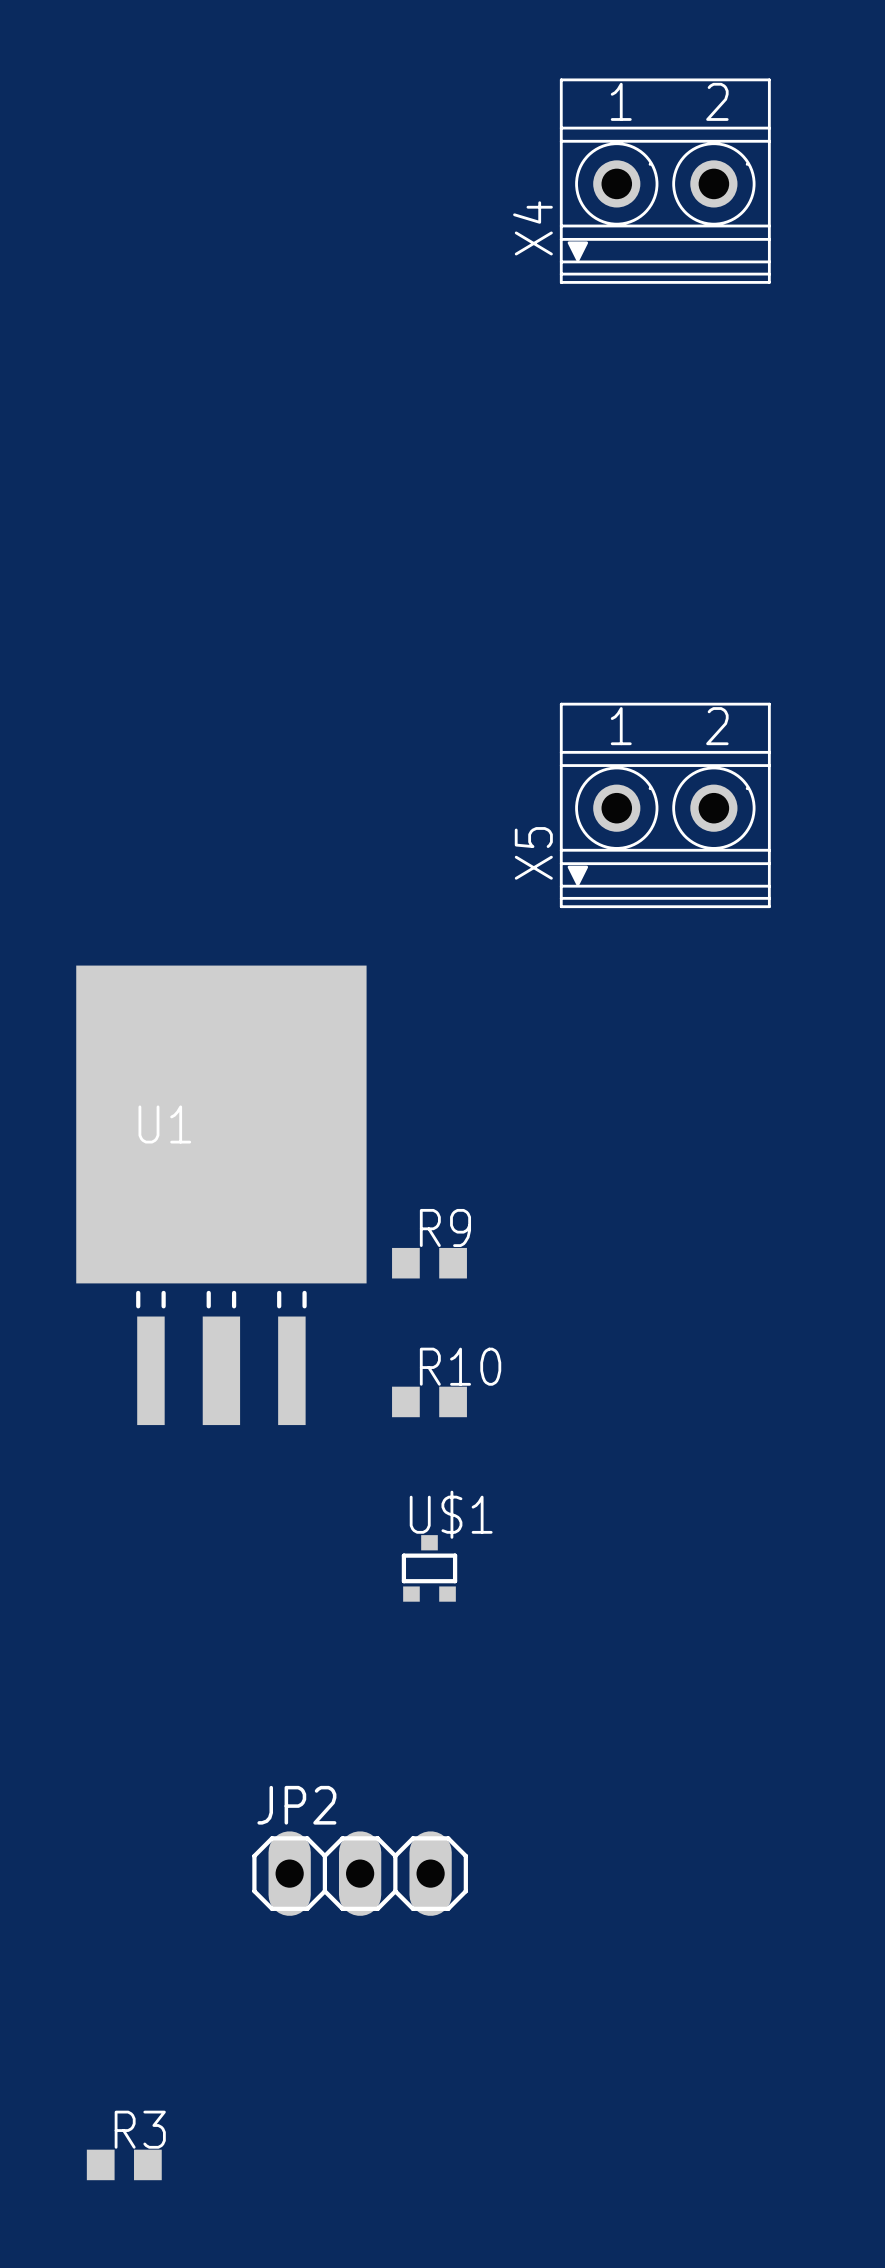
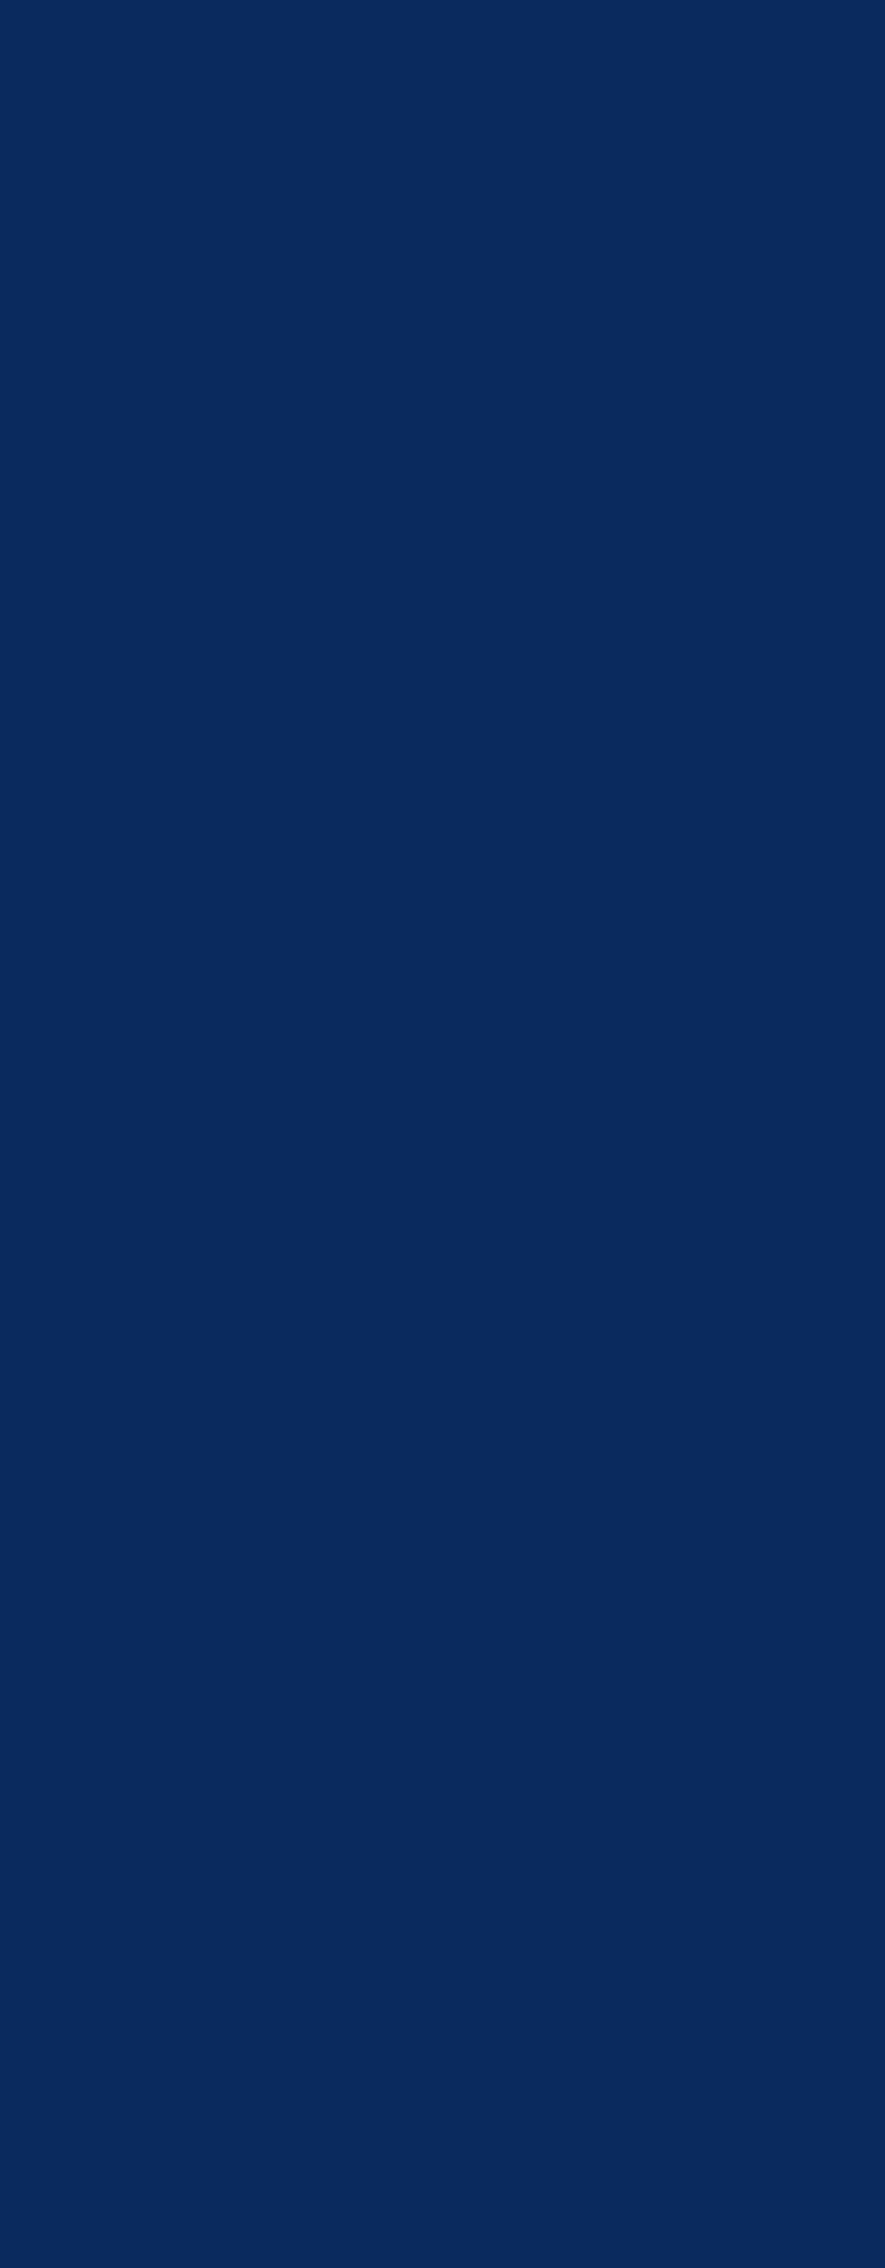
X4: (665, 181) -> none
X5: (665, 805) -> none
part: (221, 1195) -> none
R9: (429, 1263) -> none
R10: (429, 1401) -> none
U$1: (429, 1568) -> none
JP2: (360, 1873) -> none
R3: (124, 2164) -> none

